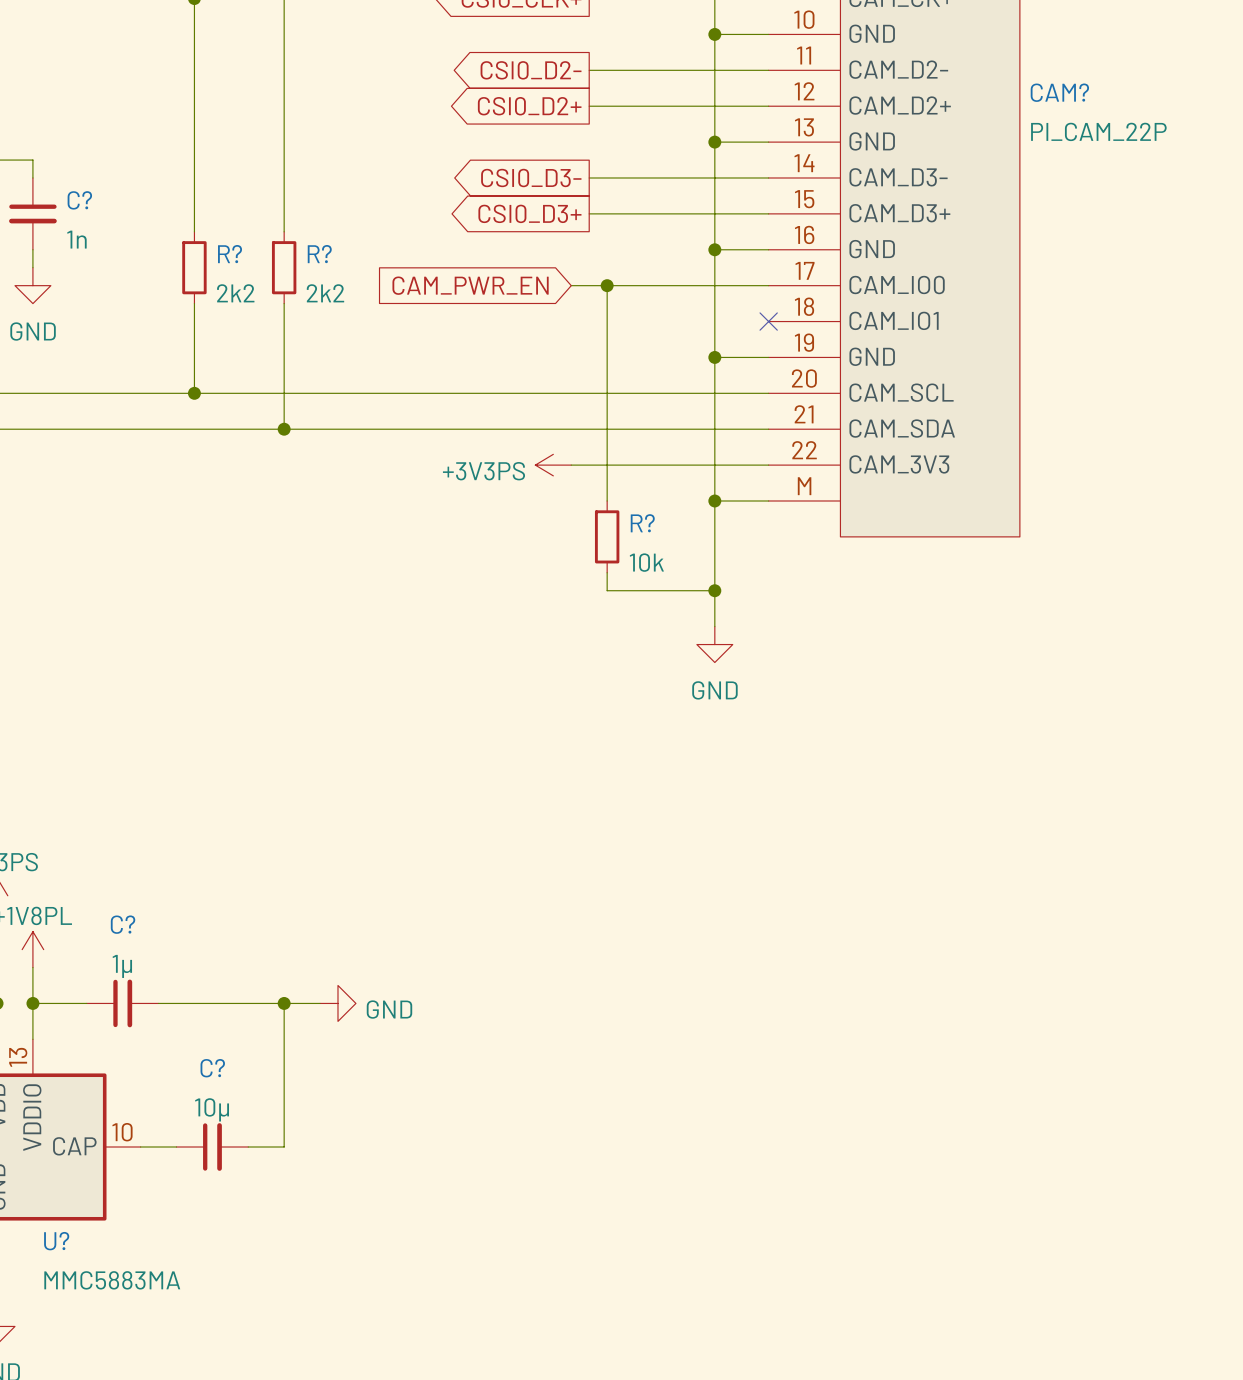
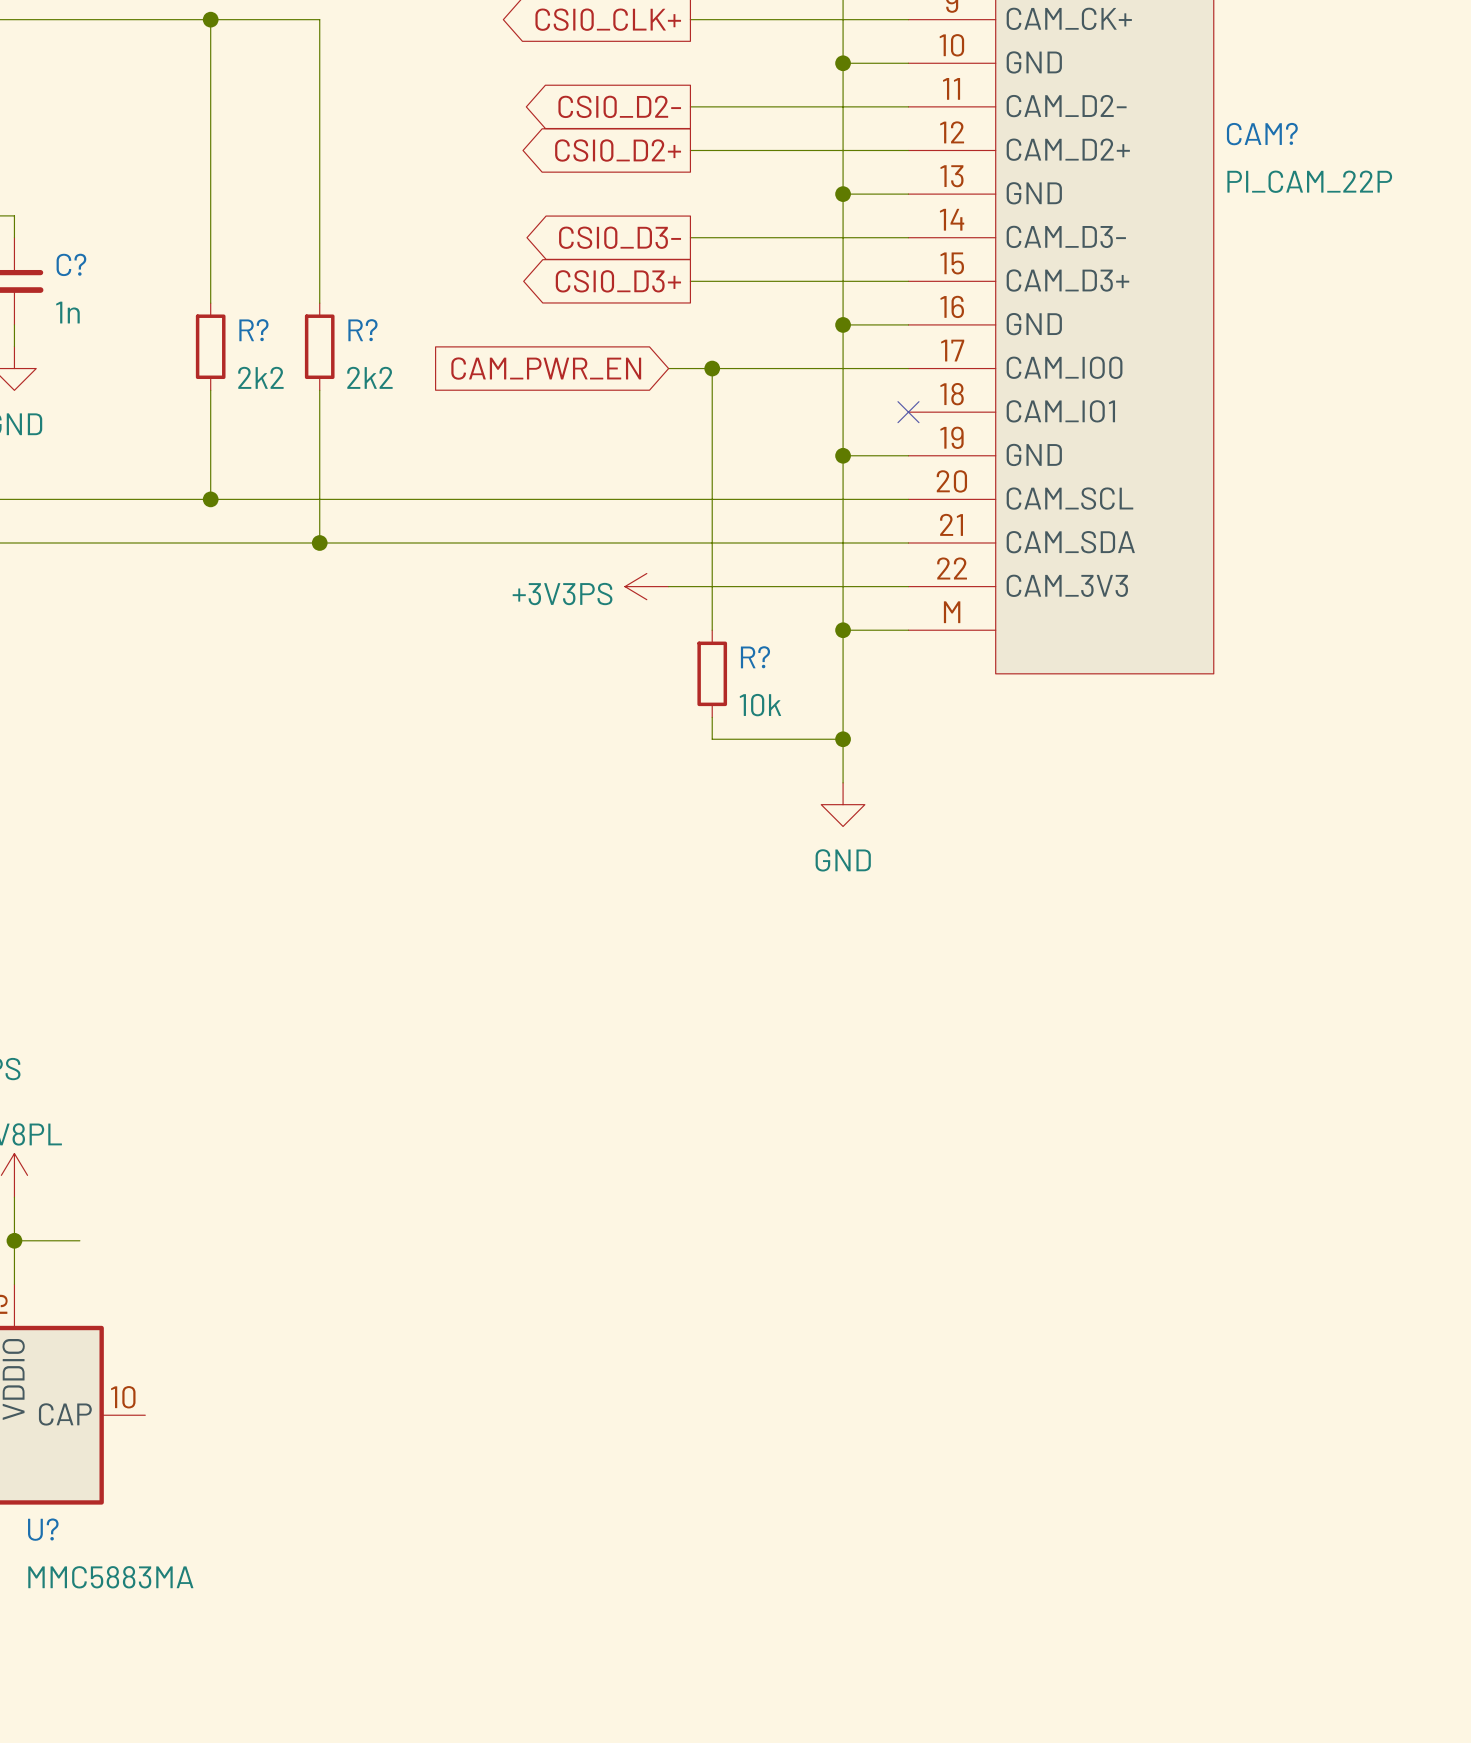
C?: 1µ (122, 1003) -> none
wire: (158, 1003) (320, 1003) -> none
wire: (284, 1003) (284, 1147) (248, 1147) -> none
junction: (284, 1003) -> none
power symbol: GND (337, 1003) -> none
wire: (140, 1147) (176, 1147) -> none
C?: 10µ (212, 1147) -> none

